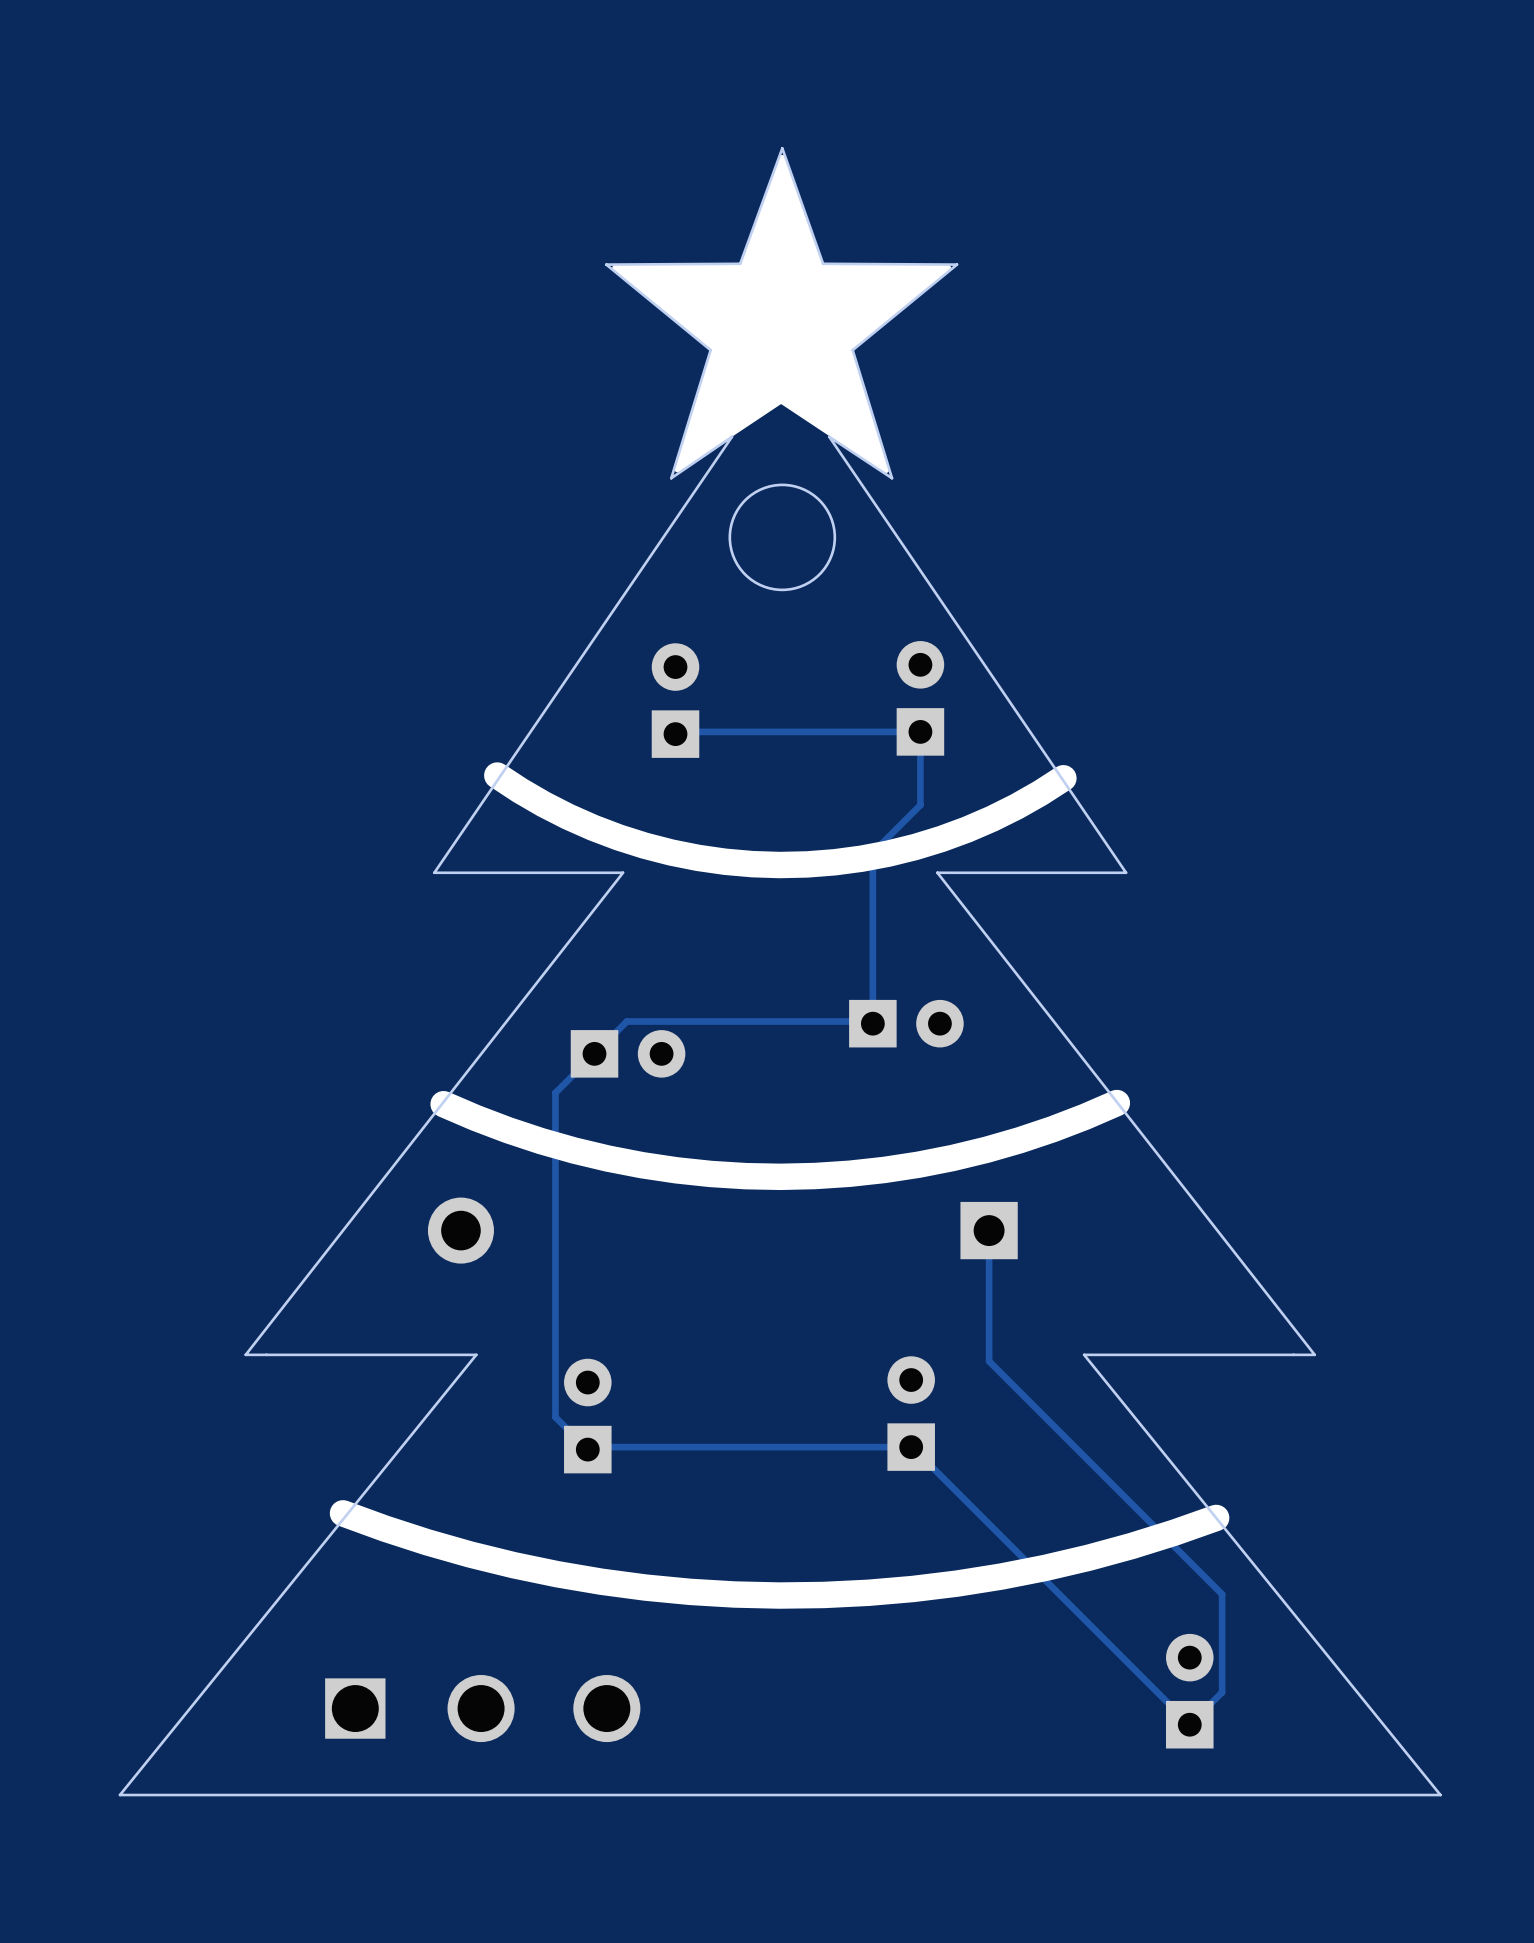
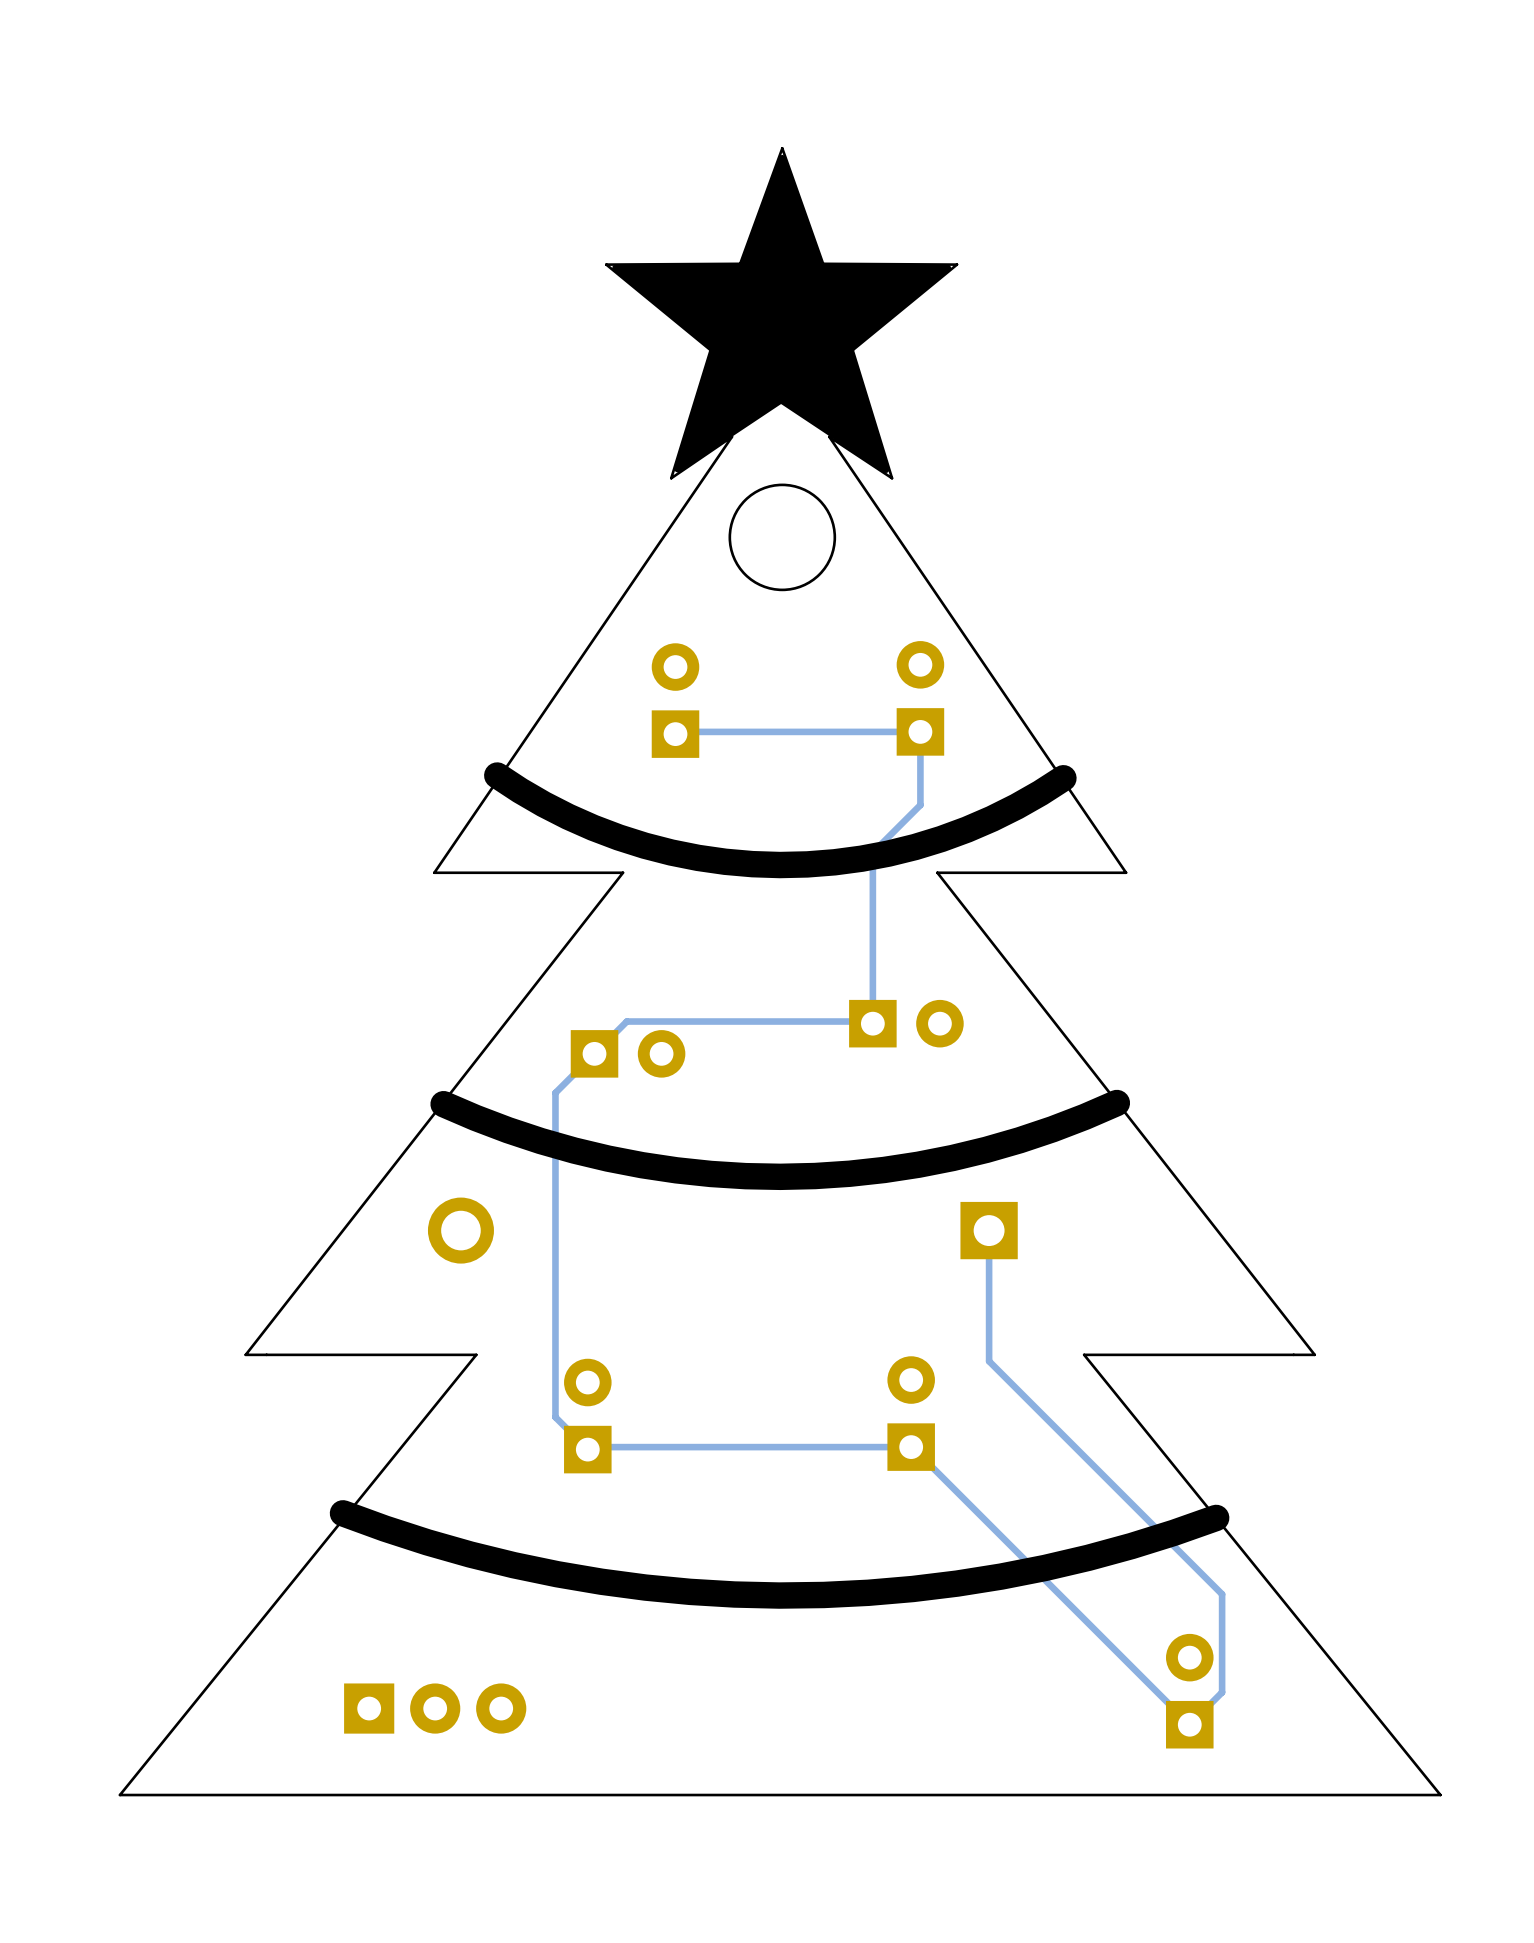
part: none -> (435, 1708)
part: (482, 1708) -> none

